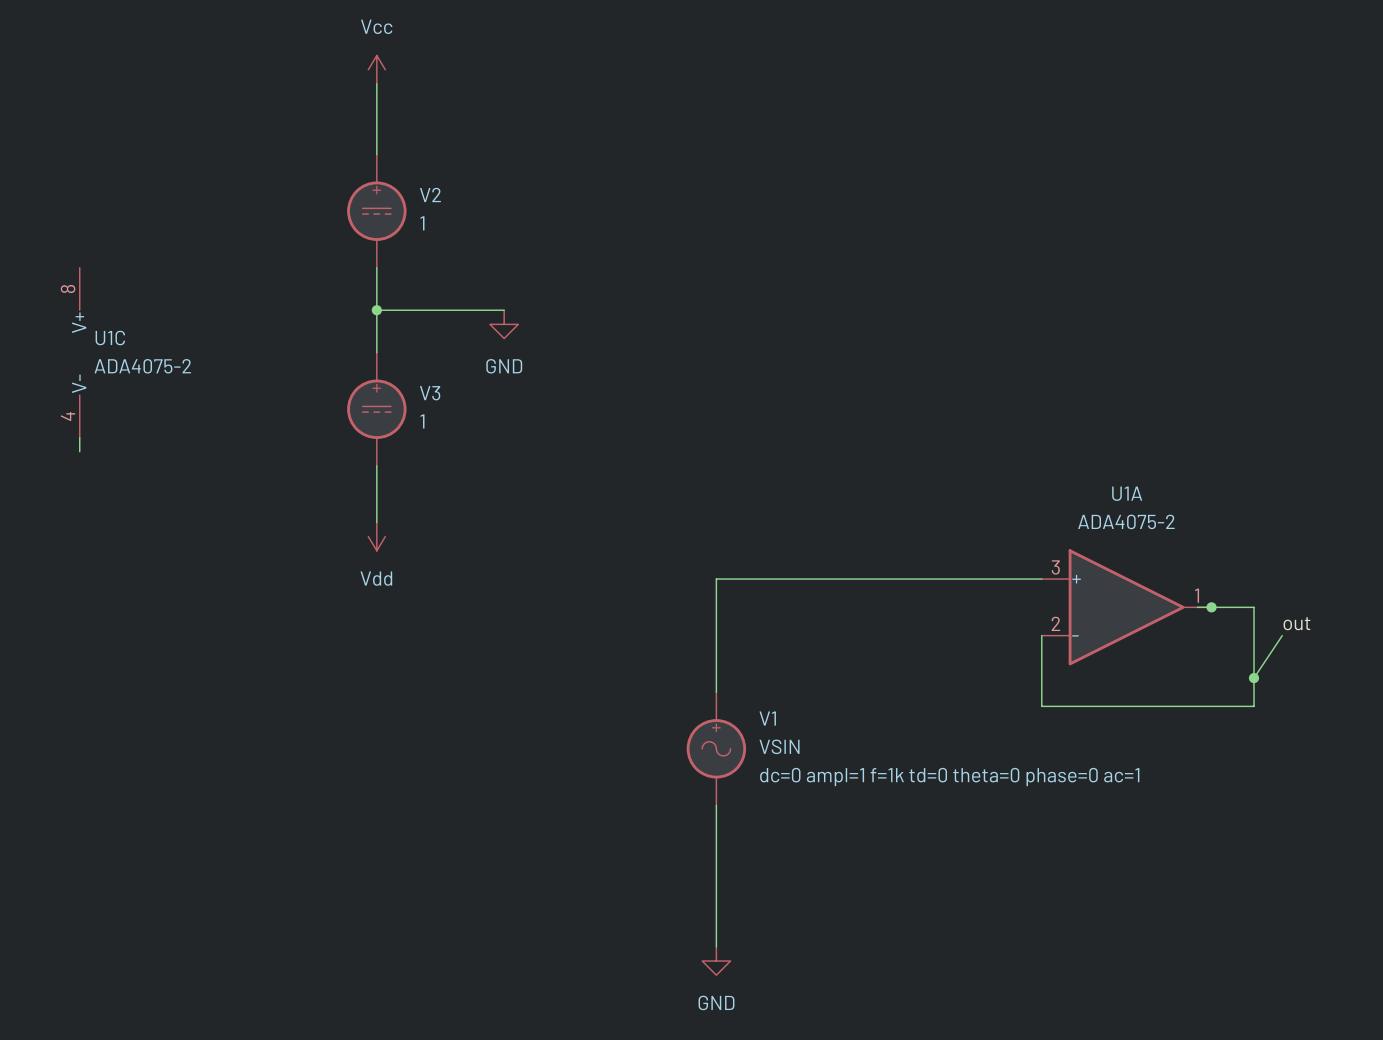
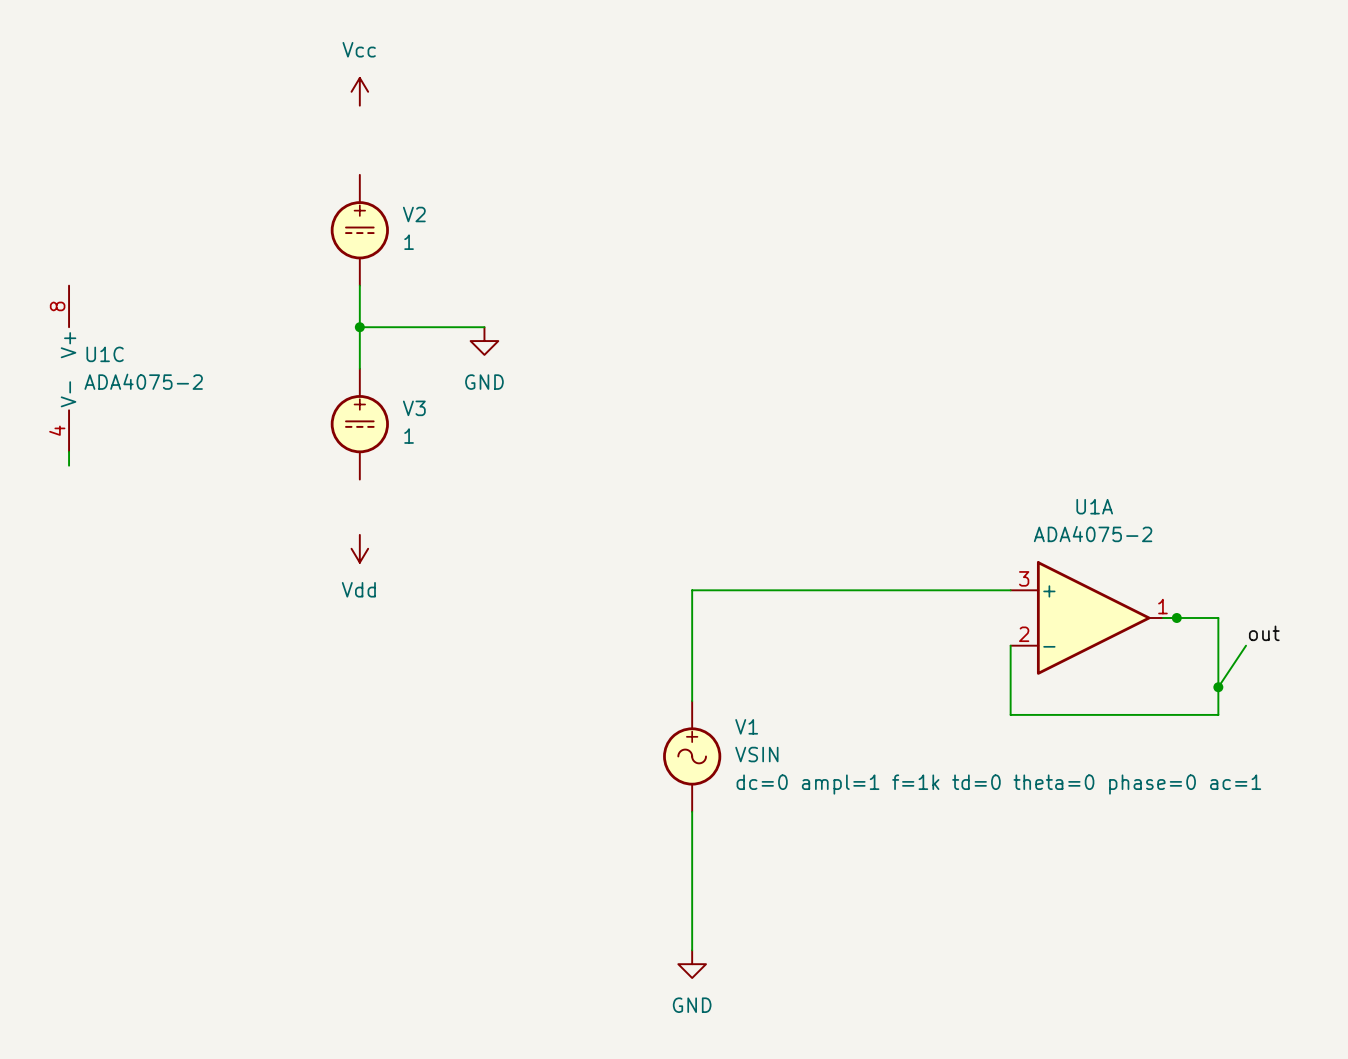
wire: (376, 83) (376, 154) -> none
wire: (376, 465) (376, 522) -> none

